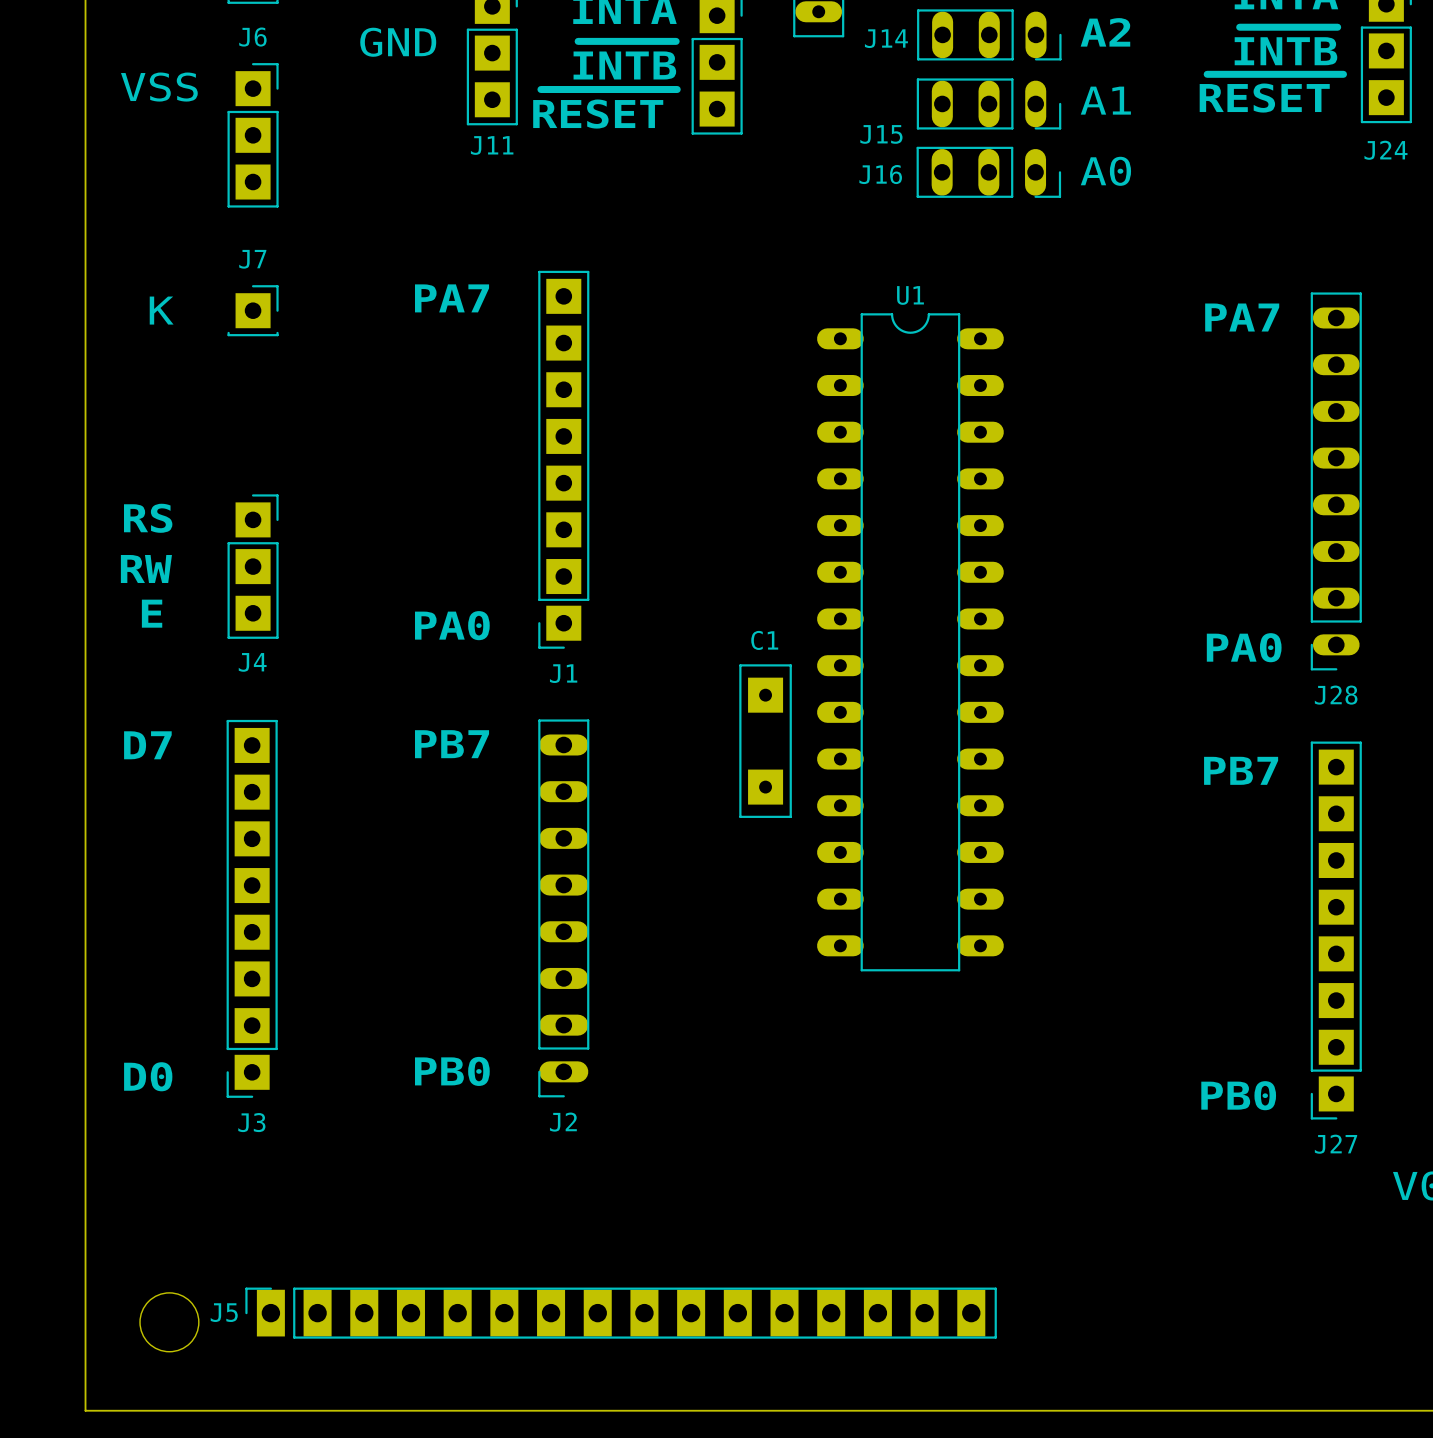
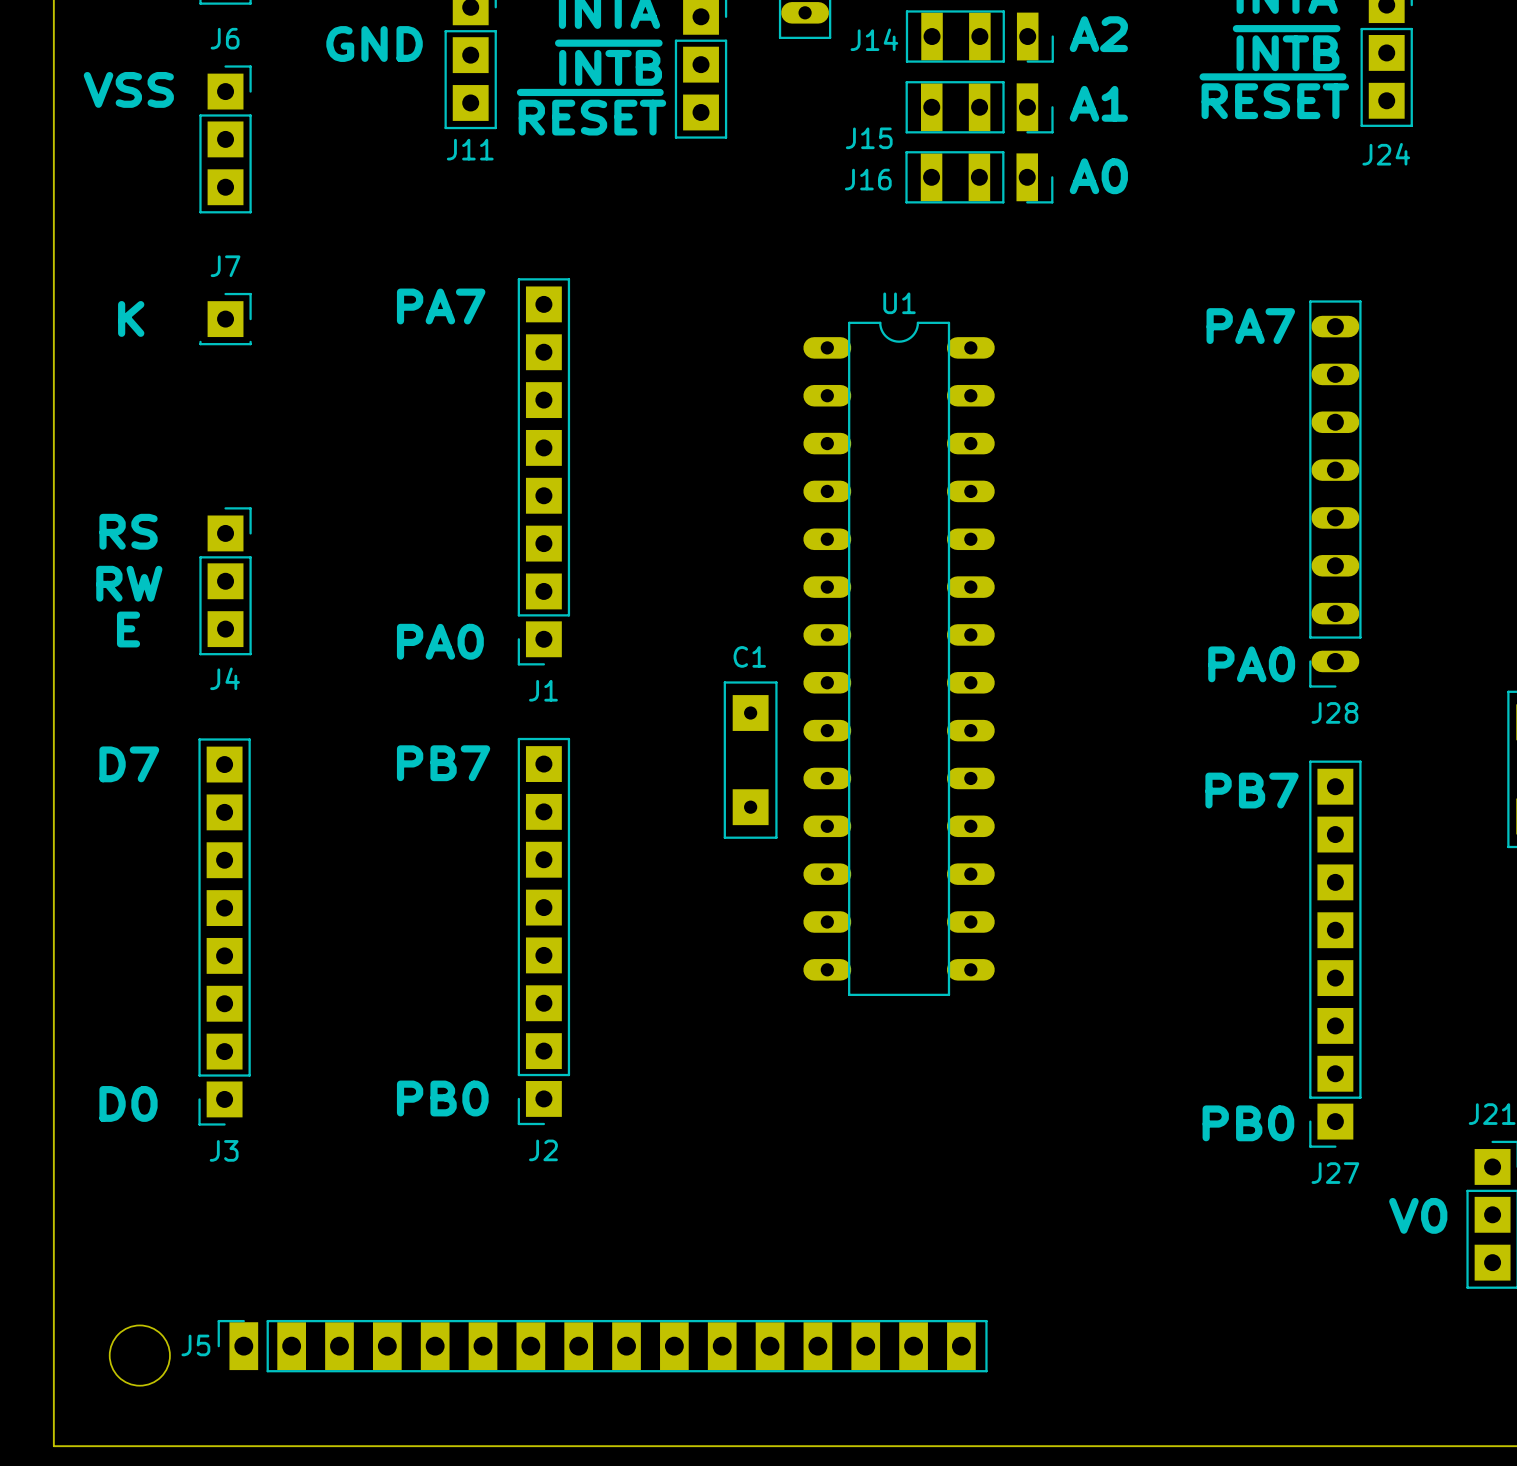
J14 footprint: [917, 9, 1062, 61] -> [905, 10, 1054, 63]
J15 footprint: [916, 78, 1062, 130] -> [905, 81, 1054, 134]
J16 footprint: [916, 146, 1062, 198] -> [905, 151, 1054, 204]
J2 footprint: [538, 719, 590, 1098] -> [517, 737, 571, 1126]

